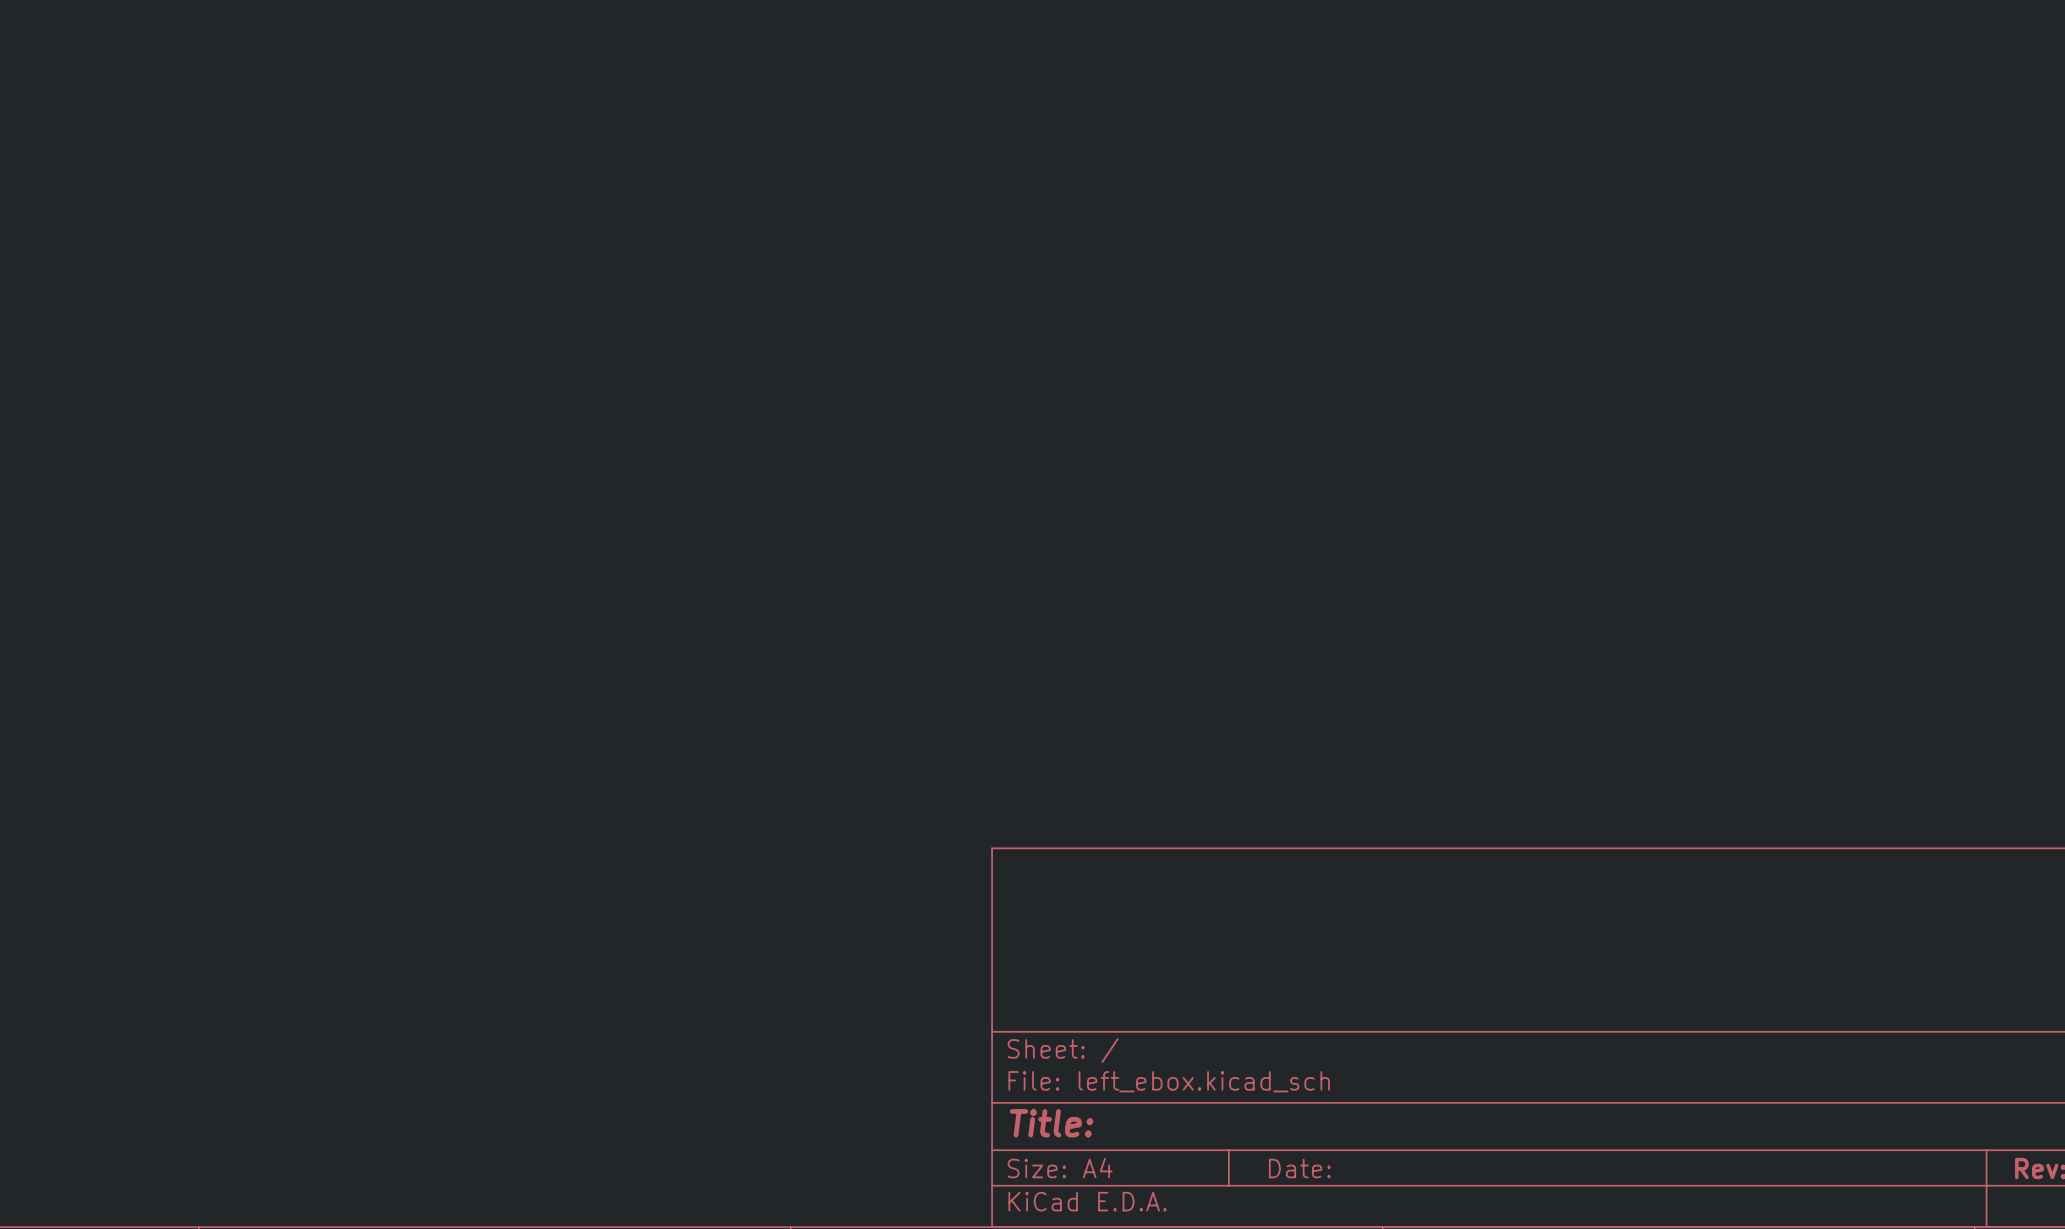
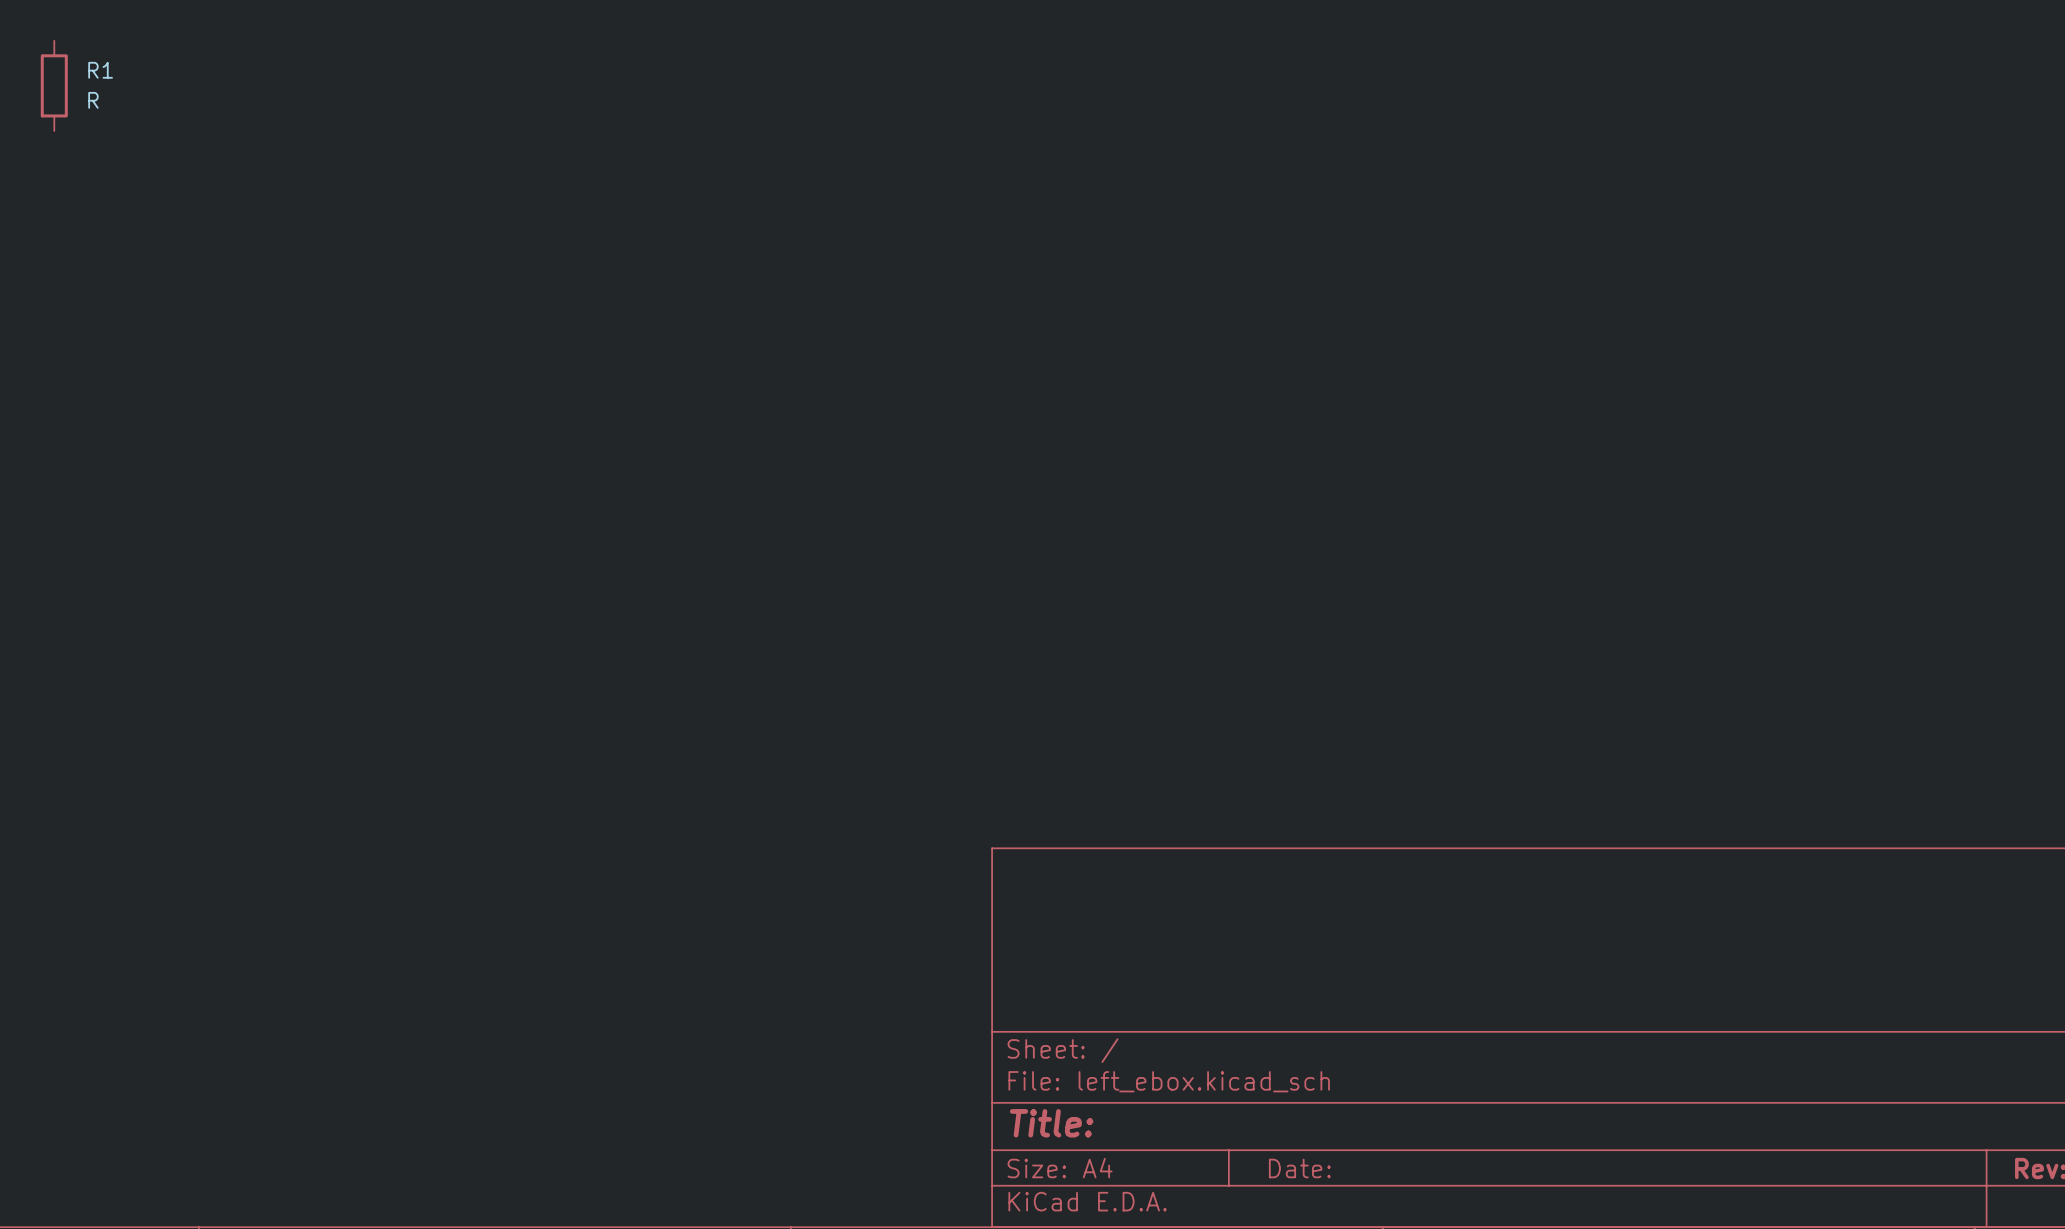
R1: none -> R (54, 85)

